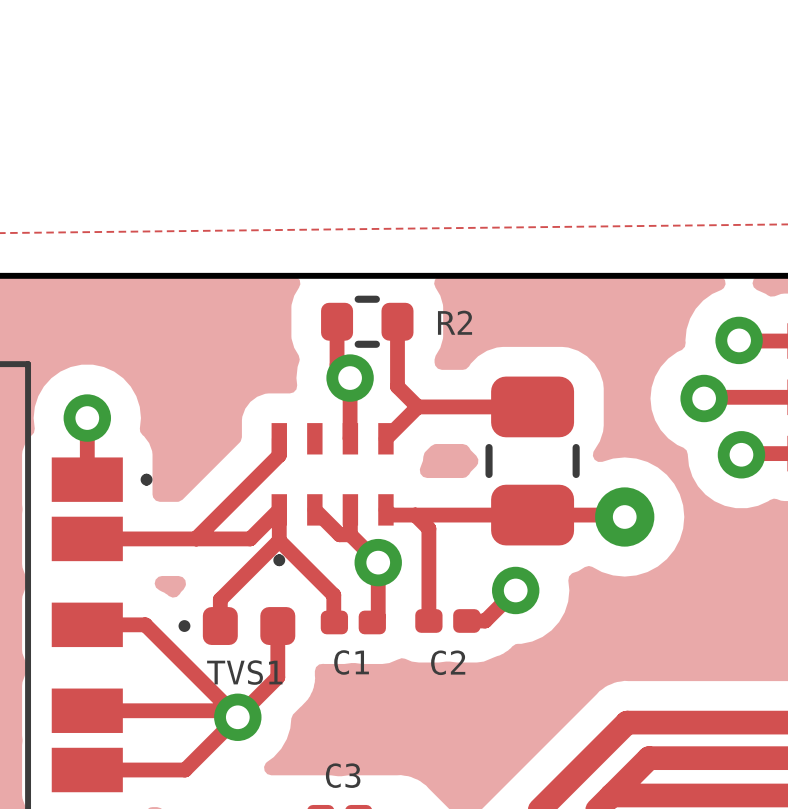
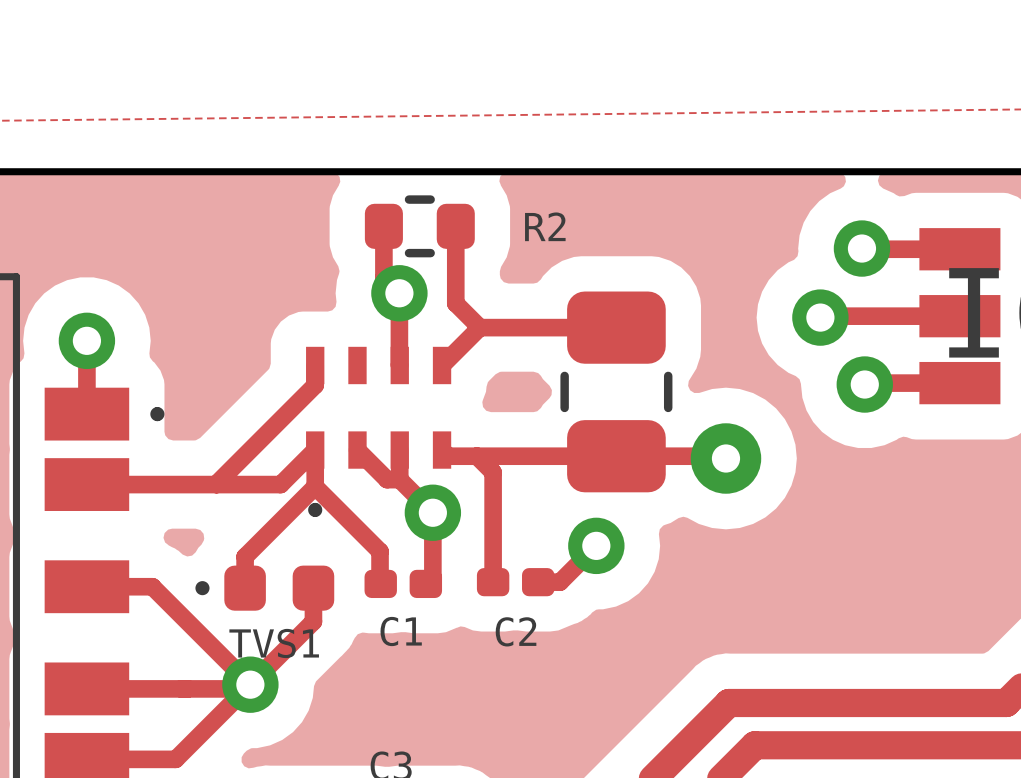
R2 name position: R2 (455, 322) -> R2 (545, 226)
track: (142, 624) (145, 624) (237, 717) -> (152, 586) (250, 684)
track: (277, 654) (277, 677) (185, 770) (161, 770) -> (313, 621) (175, 759)
via position: (237, 717) -> (250, 684)

